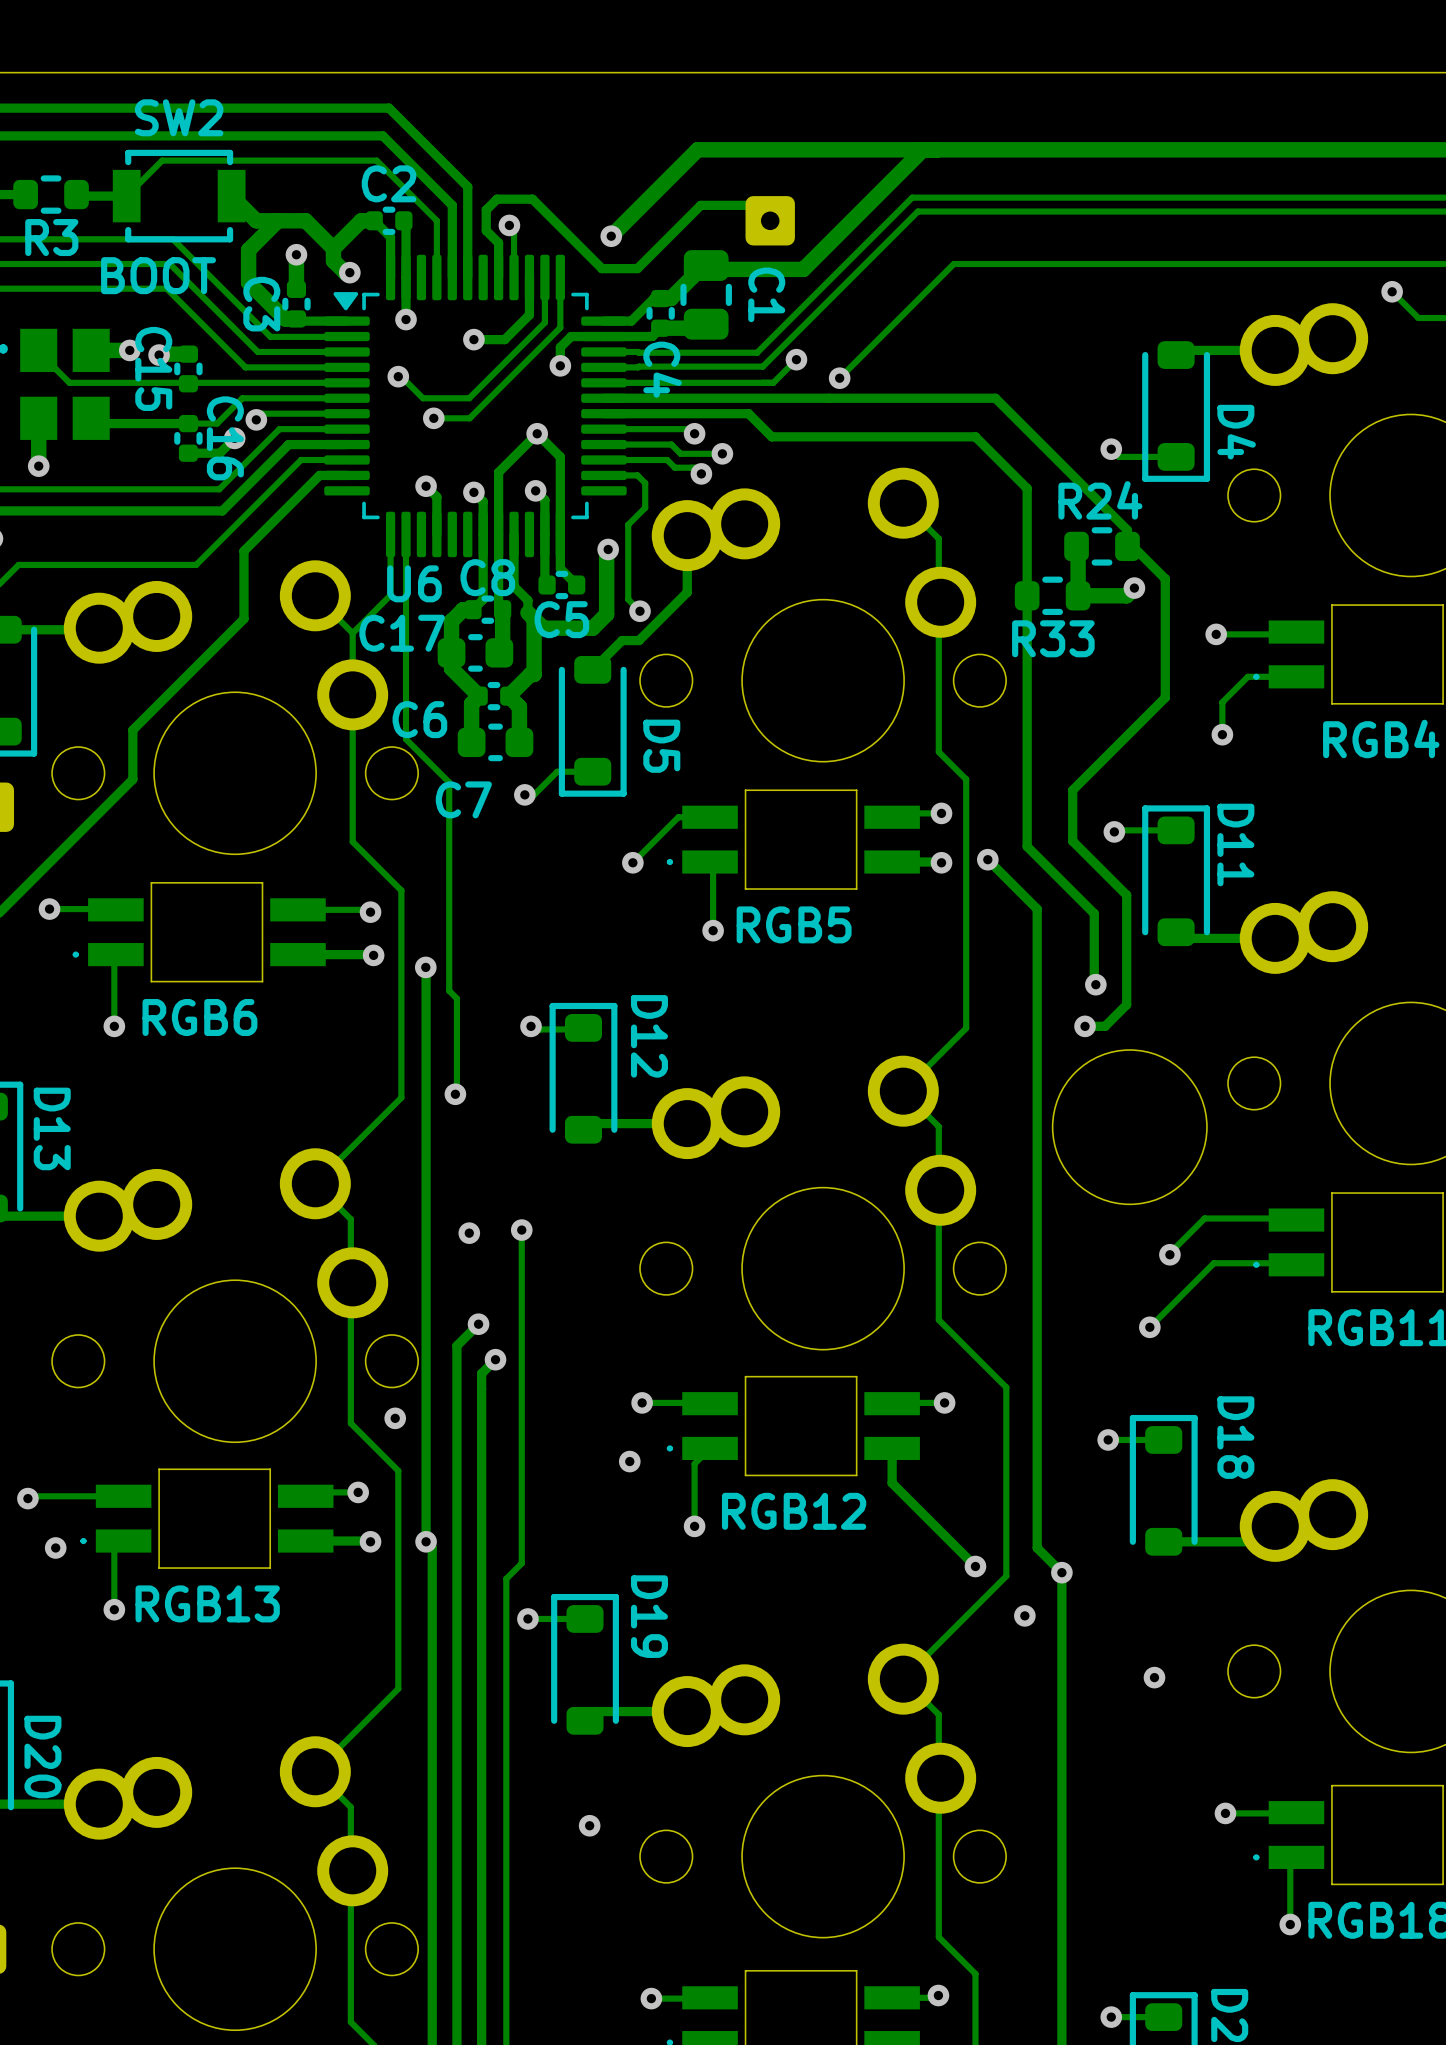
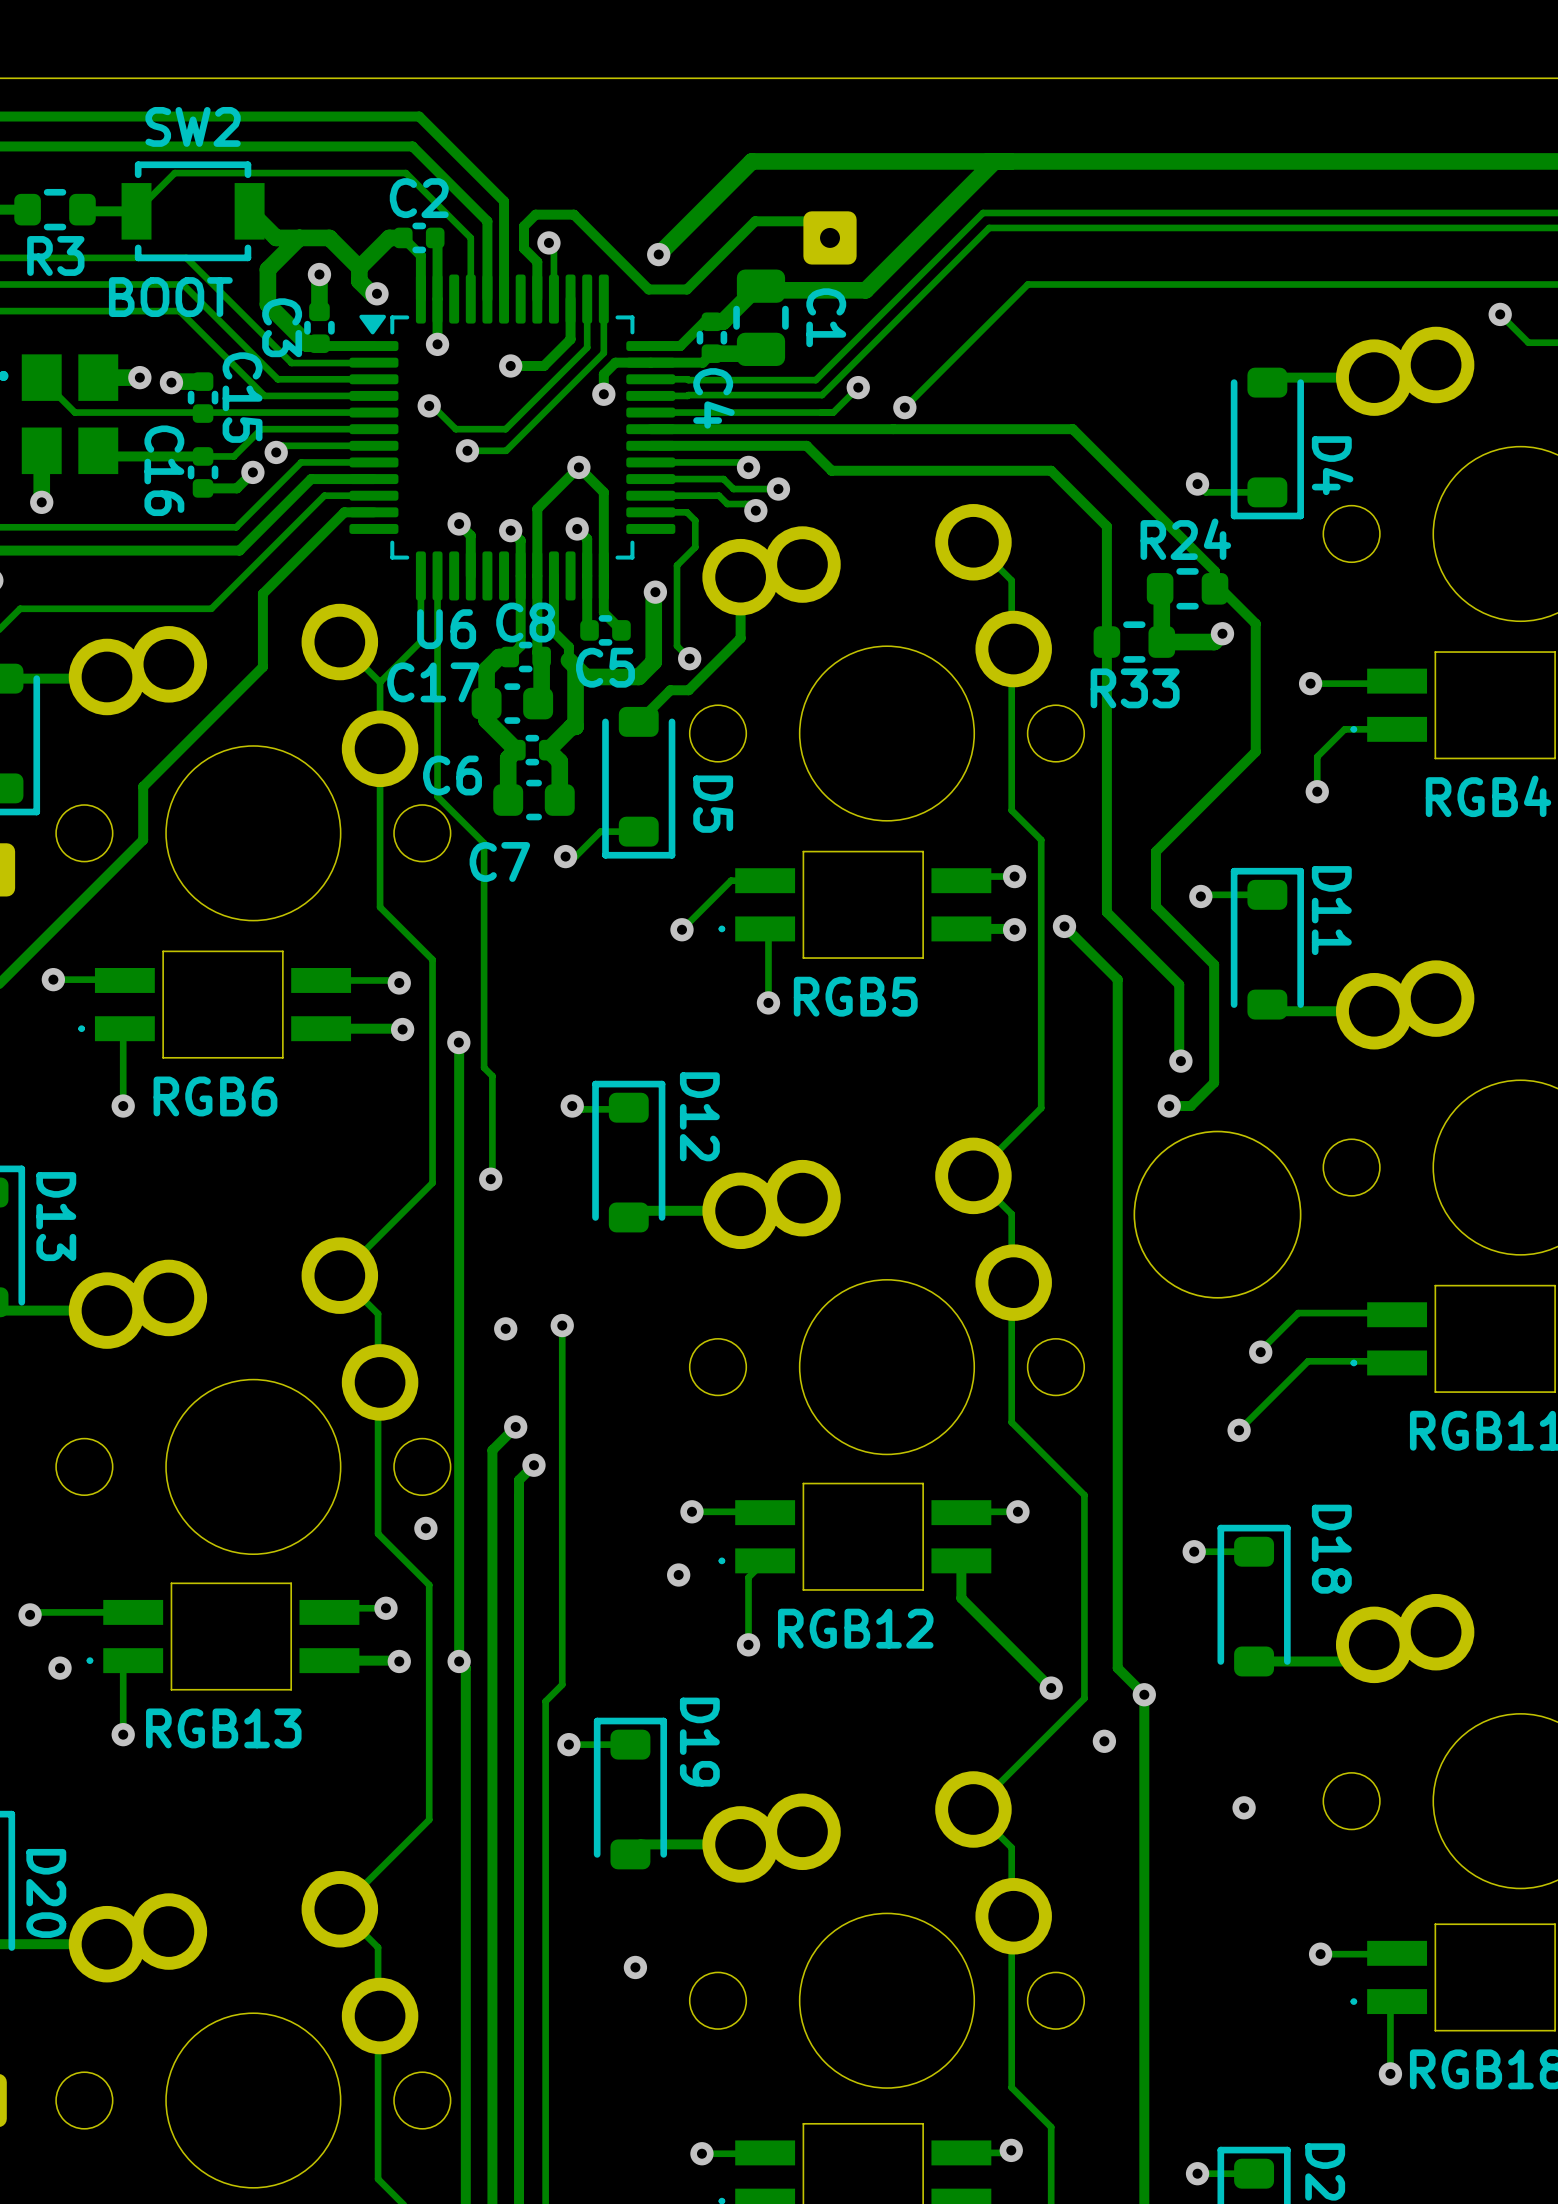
C15 name position: C15 (153, 368) -> C15 (242, 397)
C16 name position: C16 (225, 438) -> C16 (164, 470)

